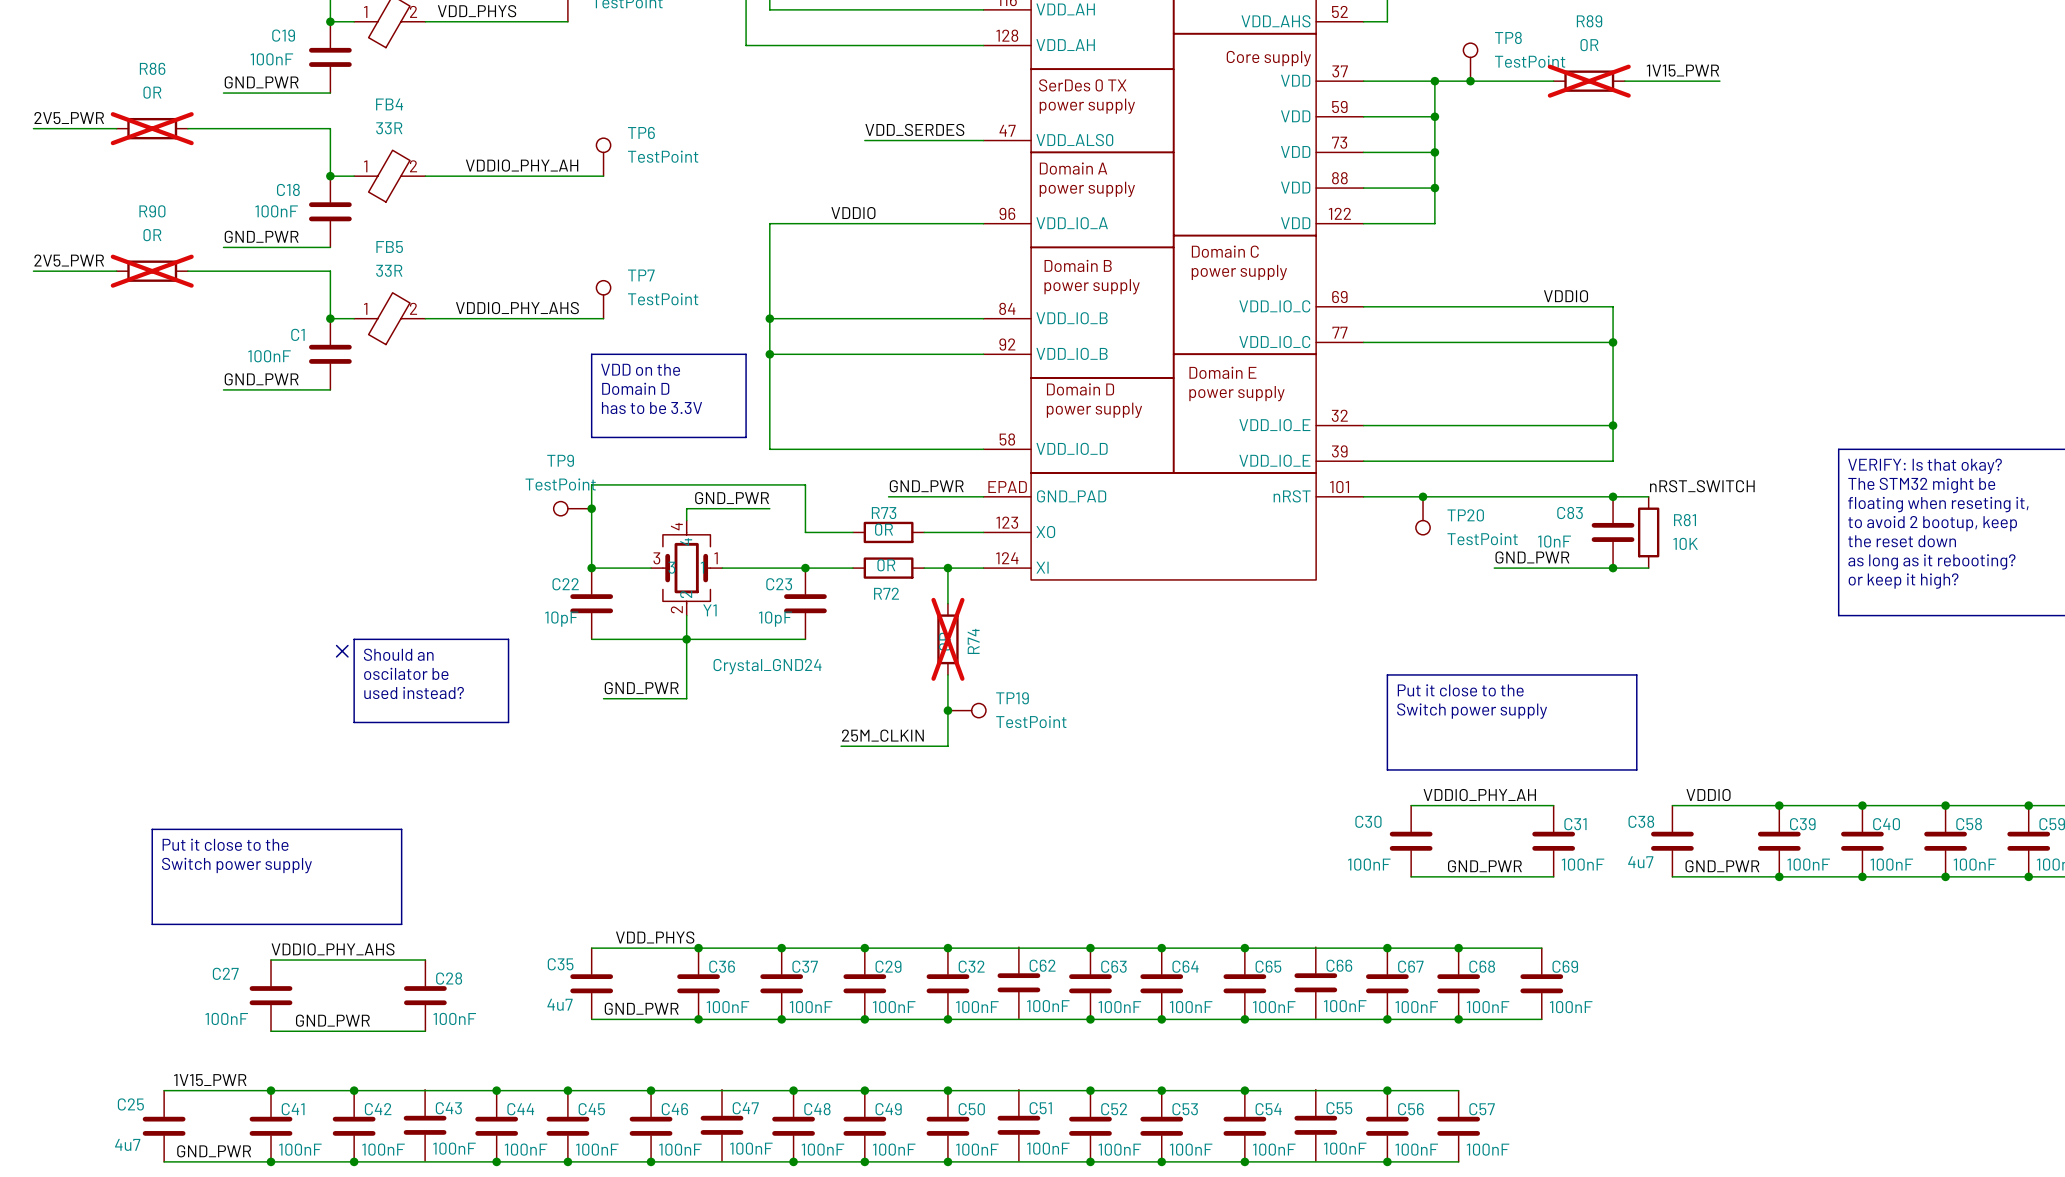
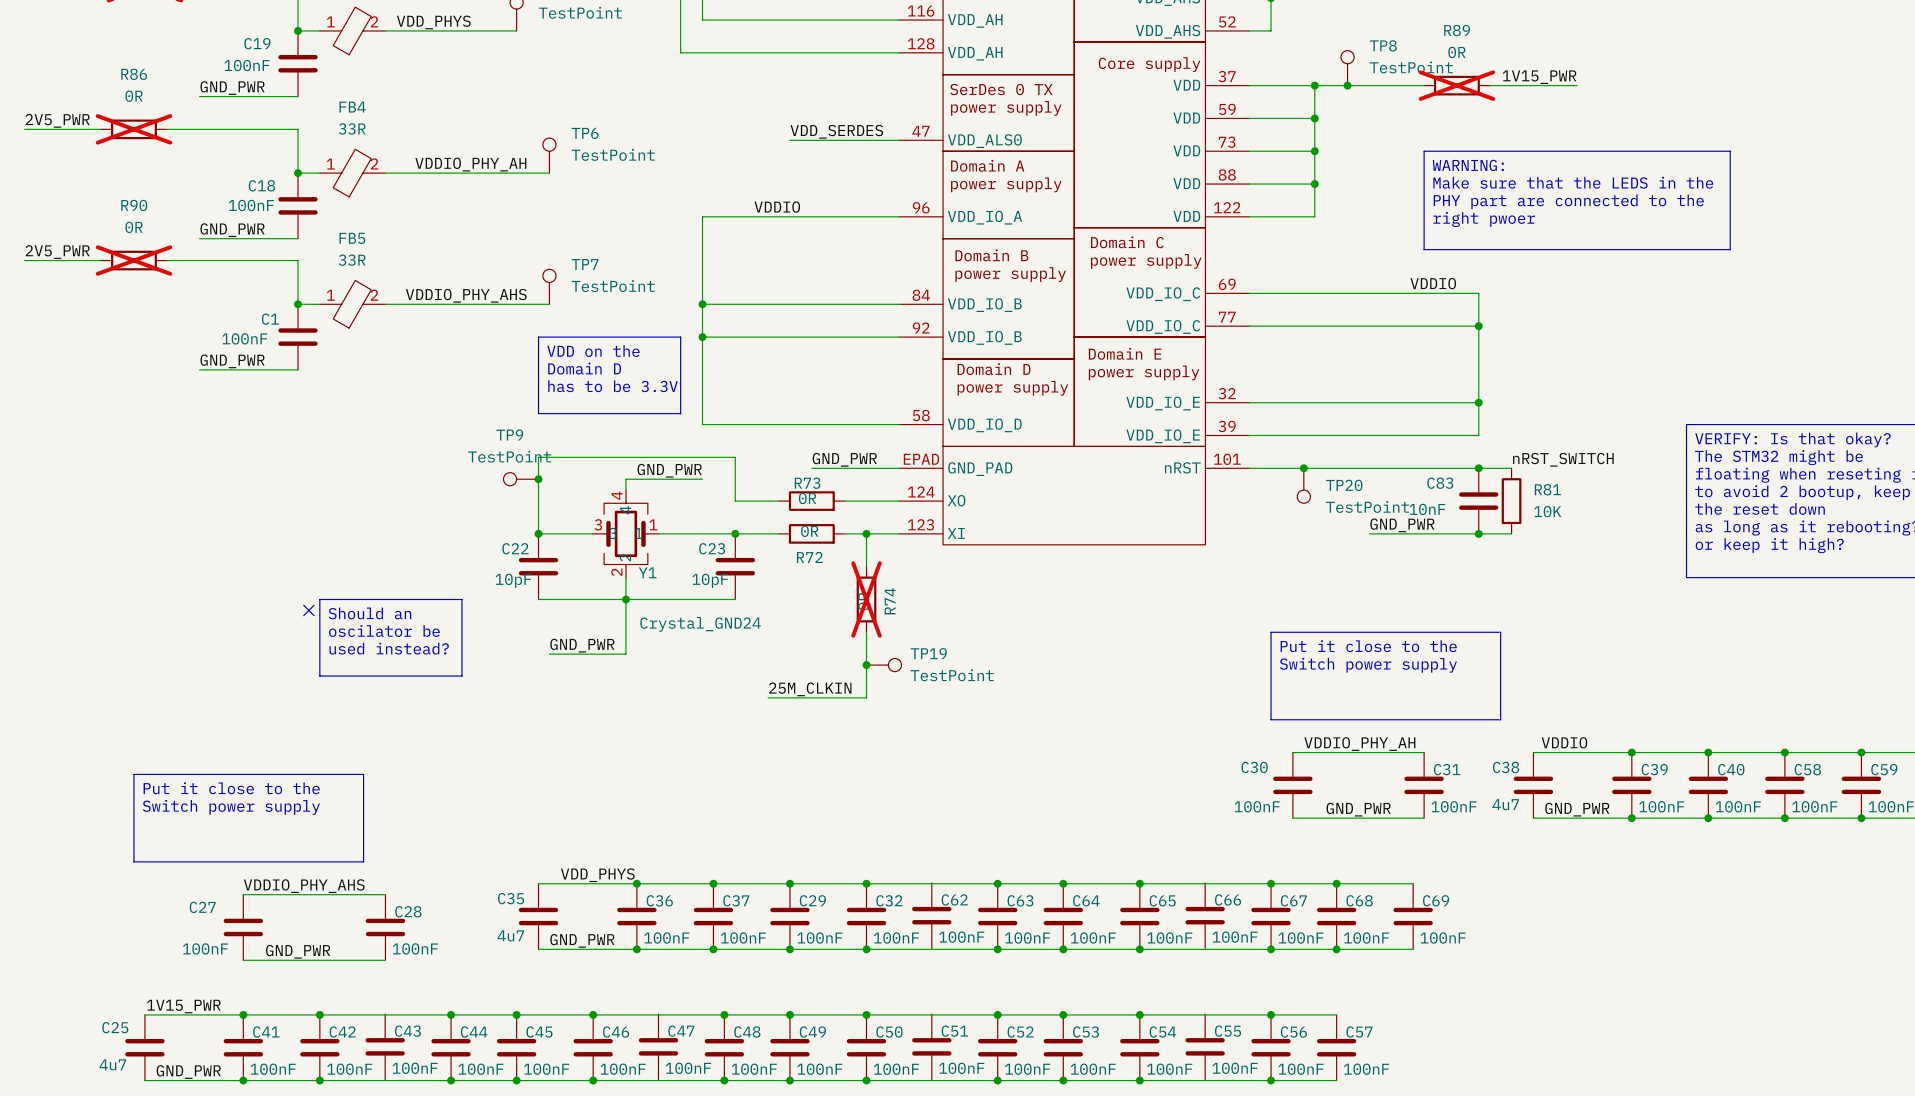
line: none -> (1424, 151) (1730, 151) (1730, 249) (1424, 249) (1424, 151)
text: none -> WARNING: (1468, 165)
text: none -> Make sure that the LEDS in the (1573, 182)
text: none -> PHY part are connected to the (1568, 201)
text: none -> right pwoer (1484, 219)
part pin number: 123 (1007, 522) -> 124 (921, 491)
part pin number: 124 (1007, 558) -> 123 (920, 524)

